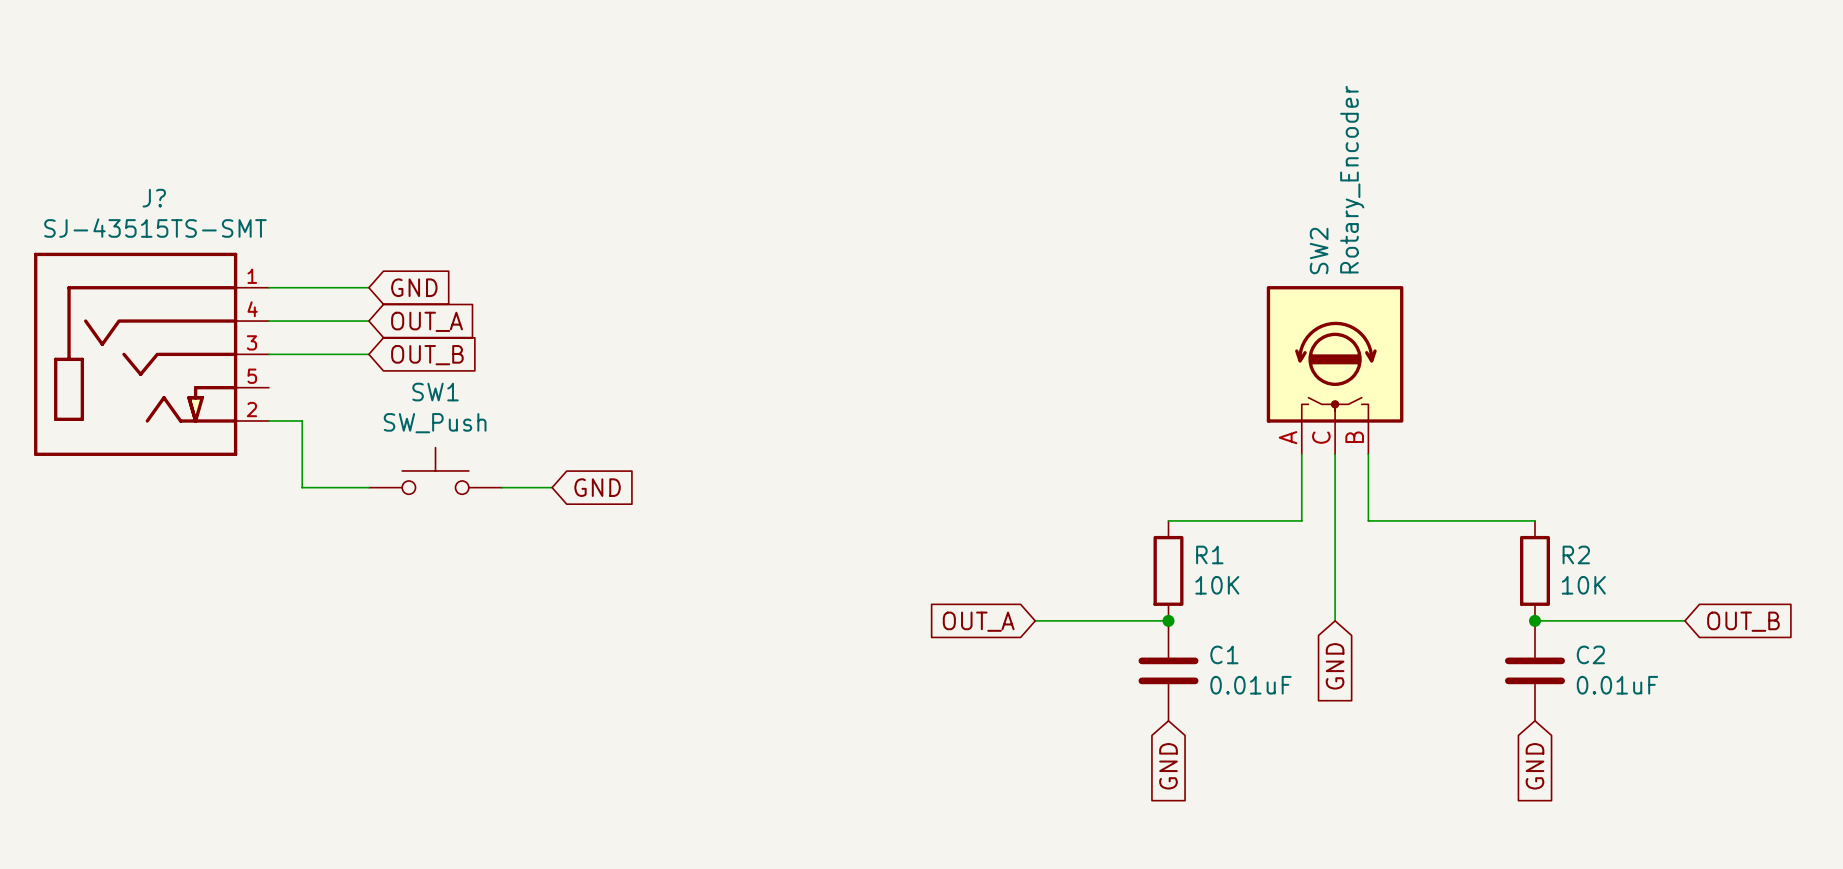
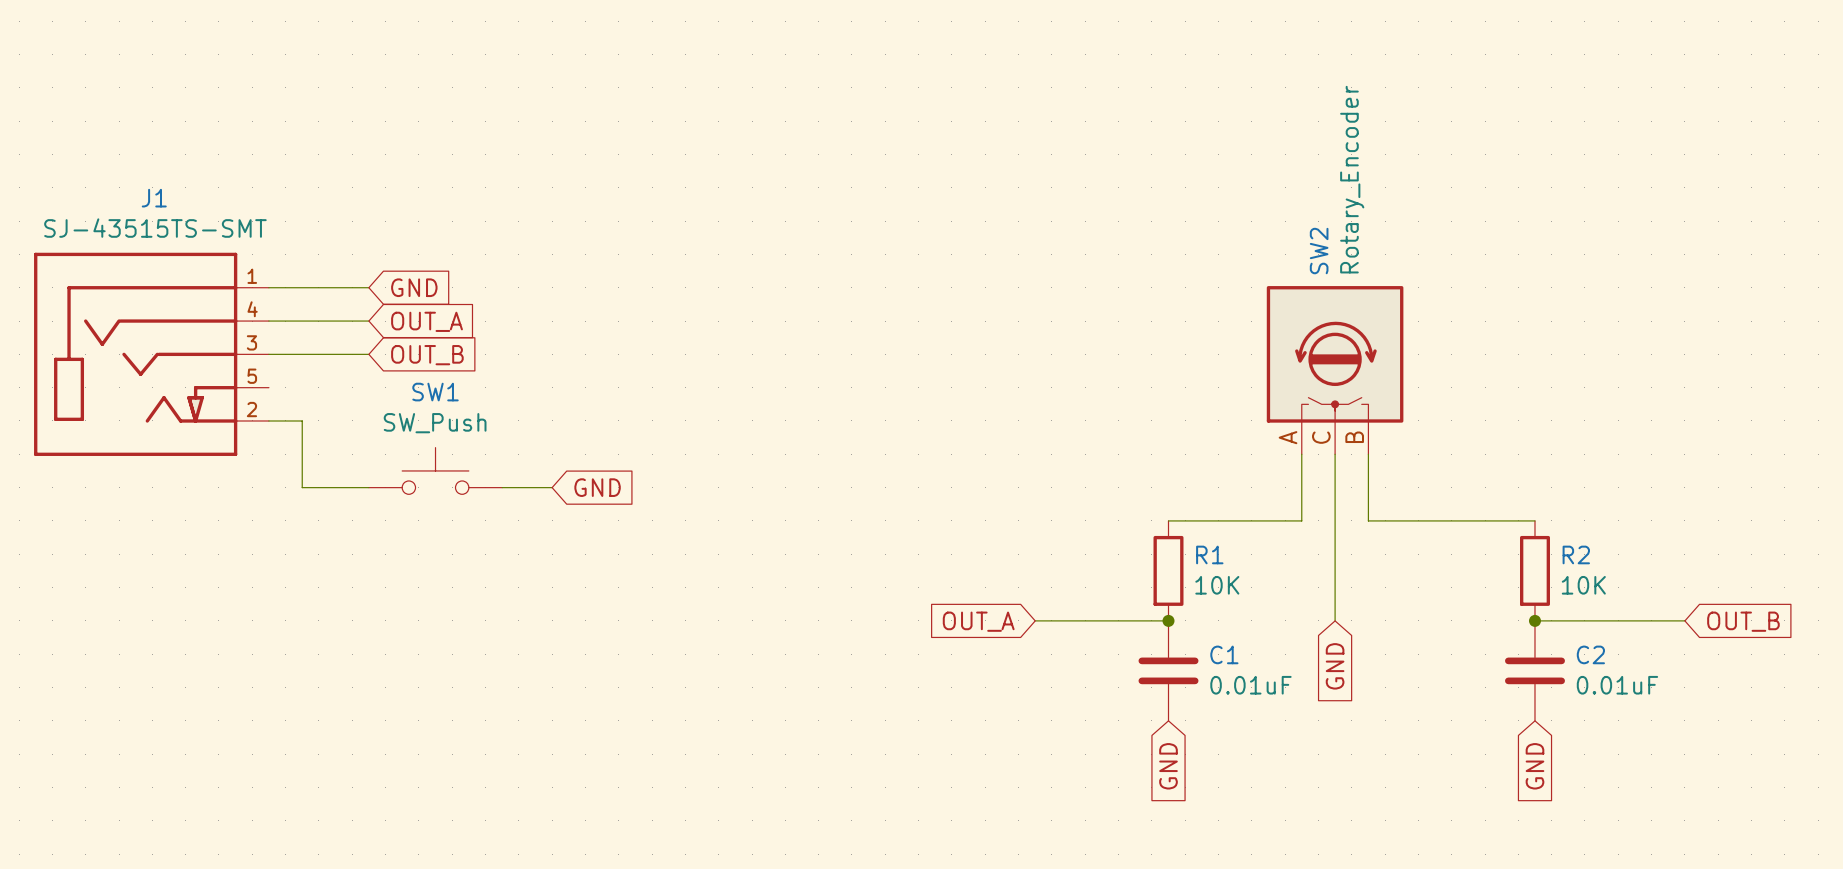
J? name: J? (154, 198) -> J1 (154, 198)

